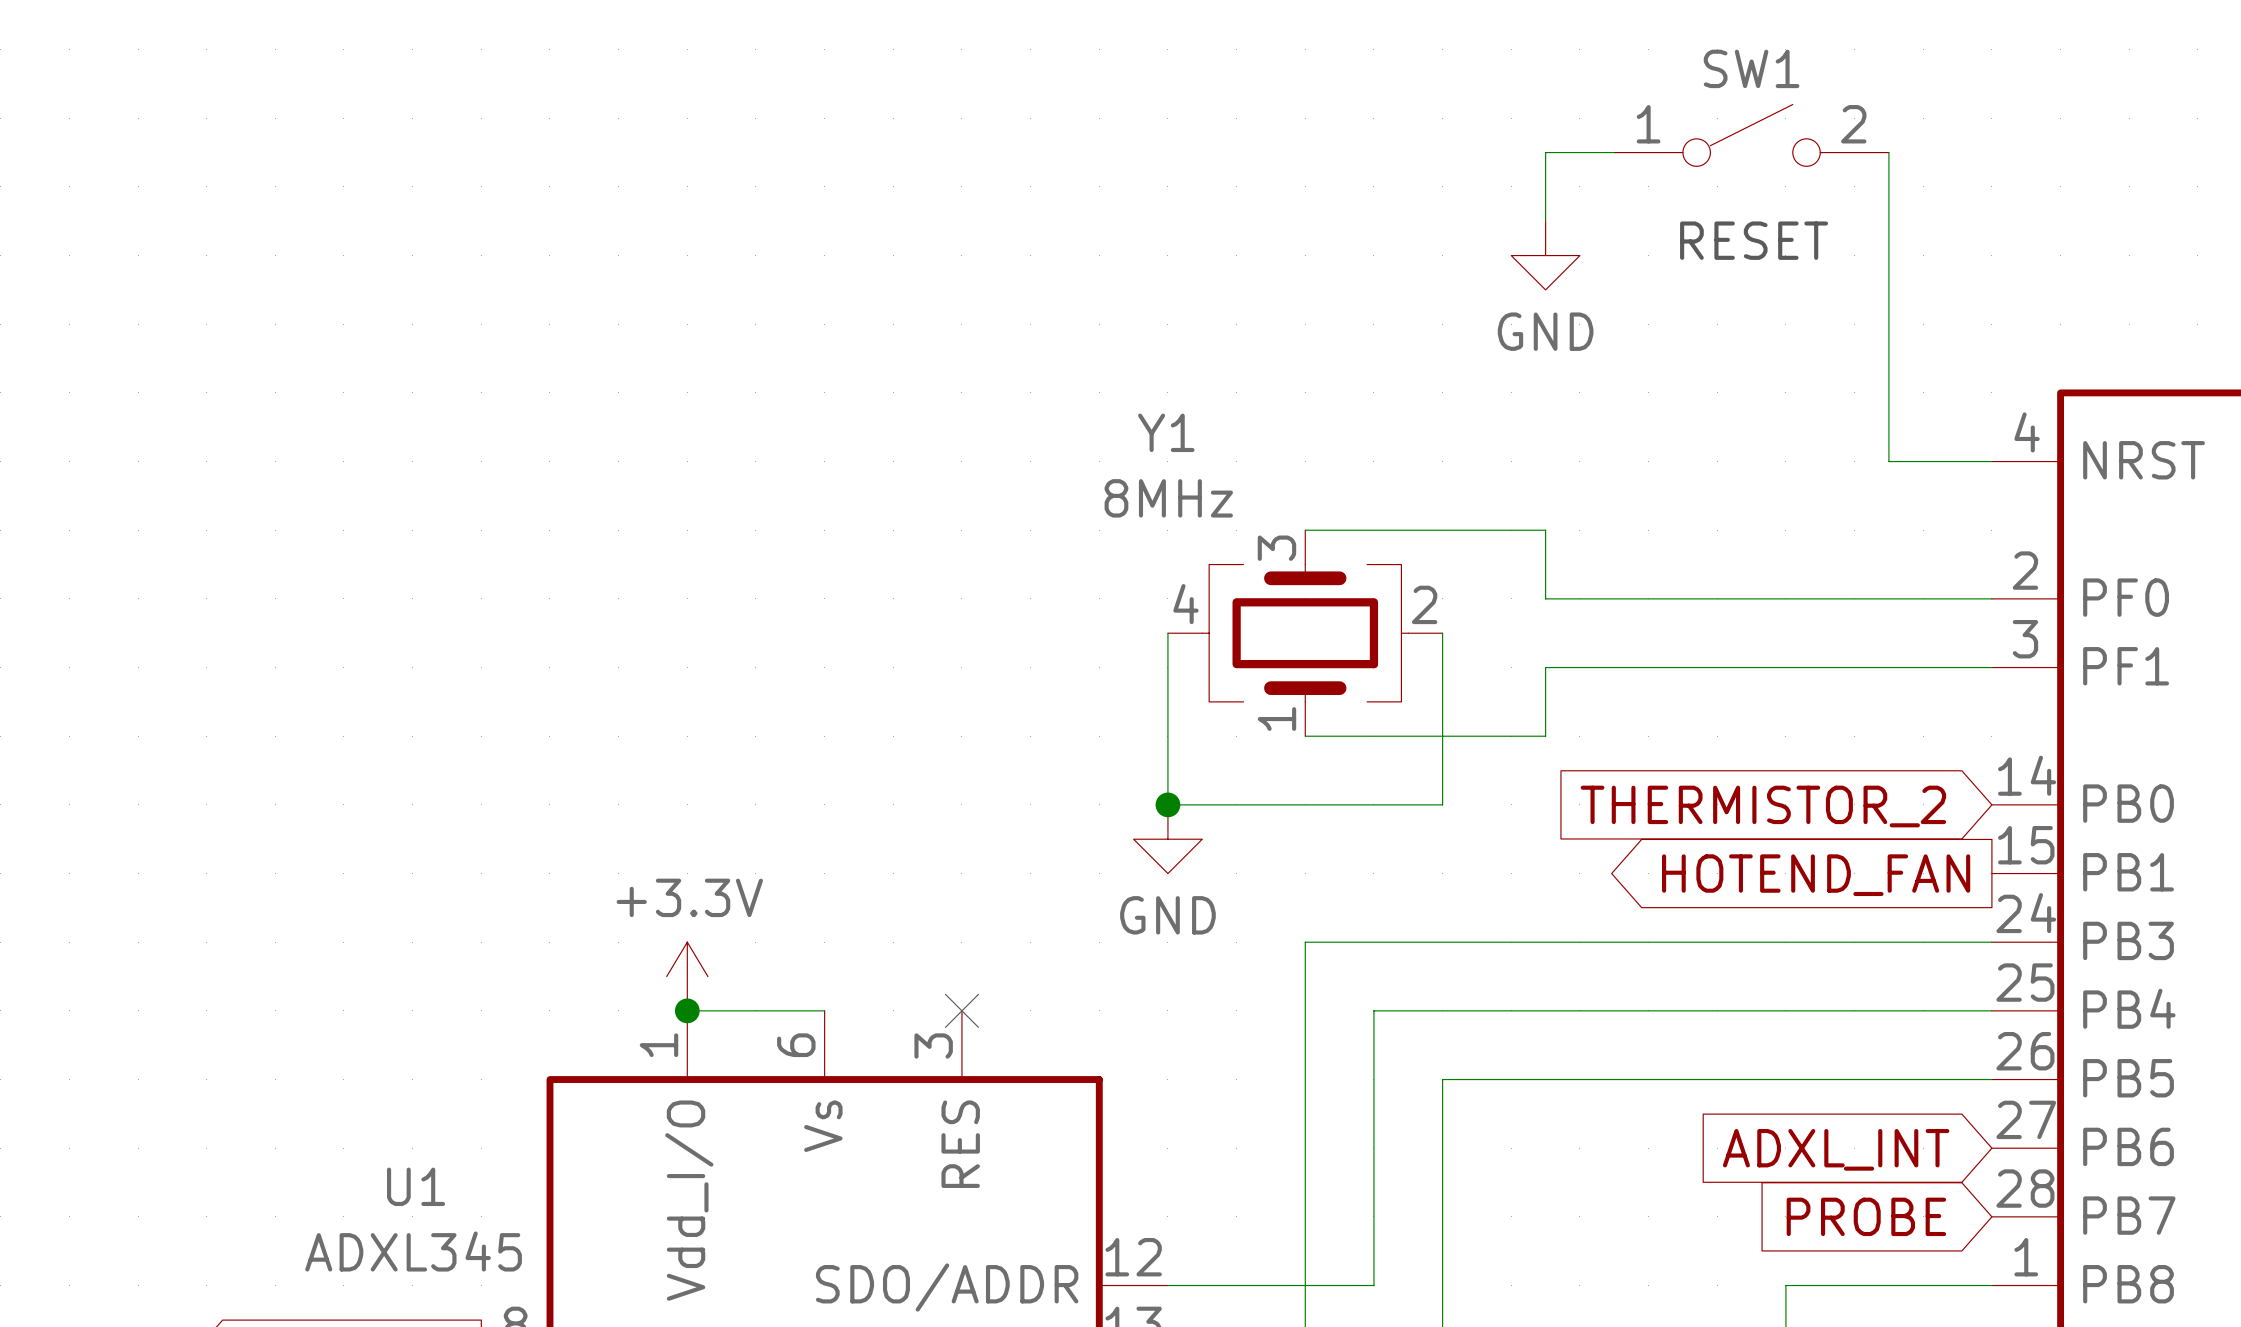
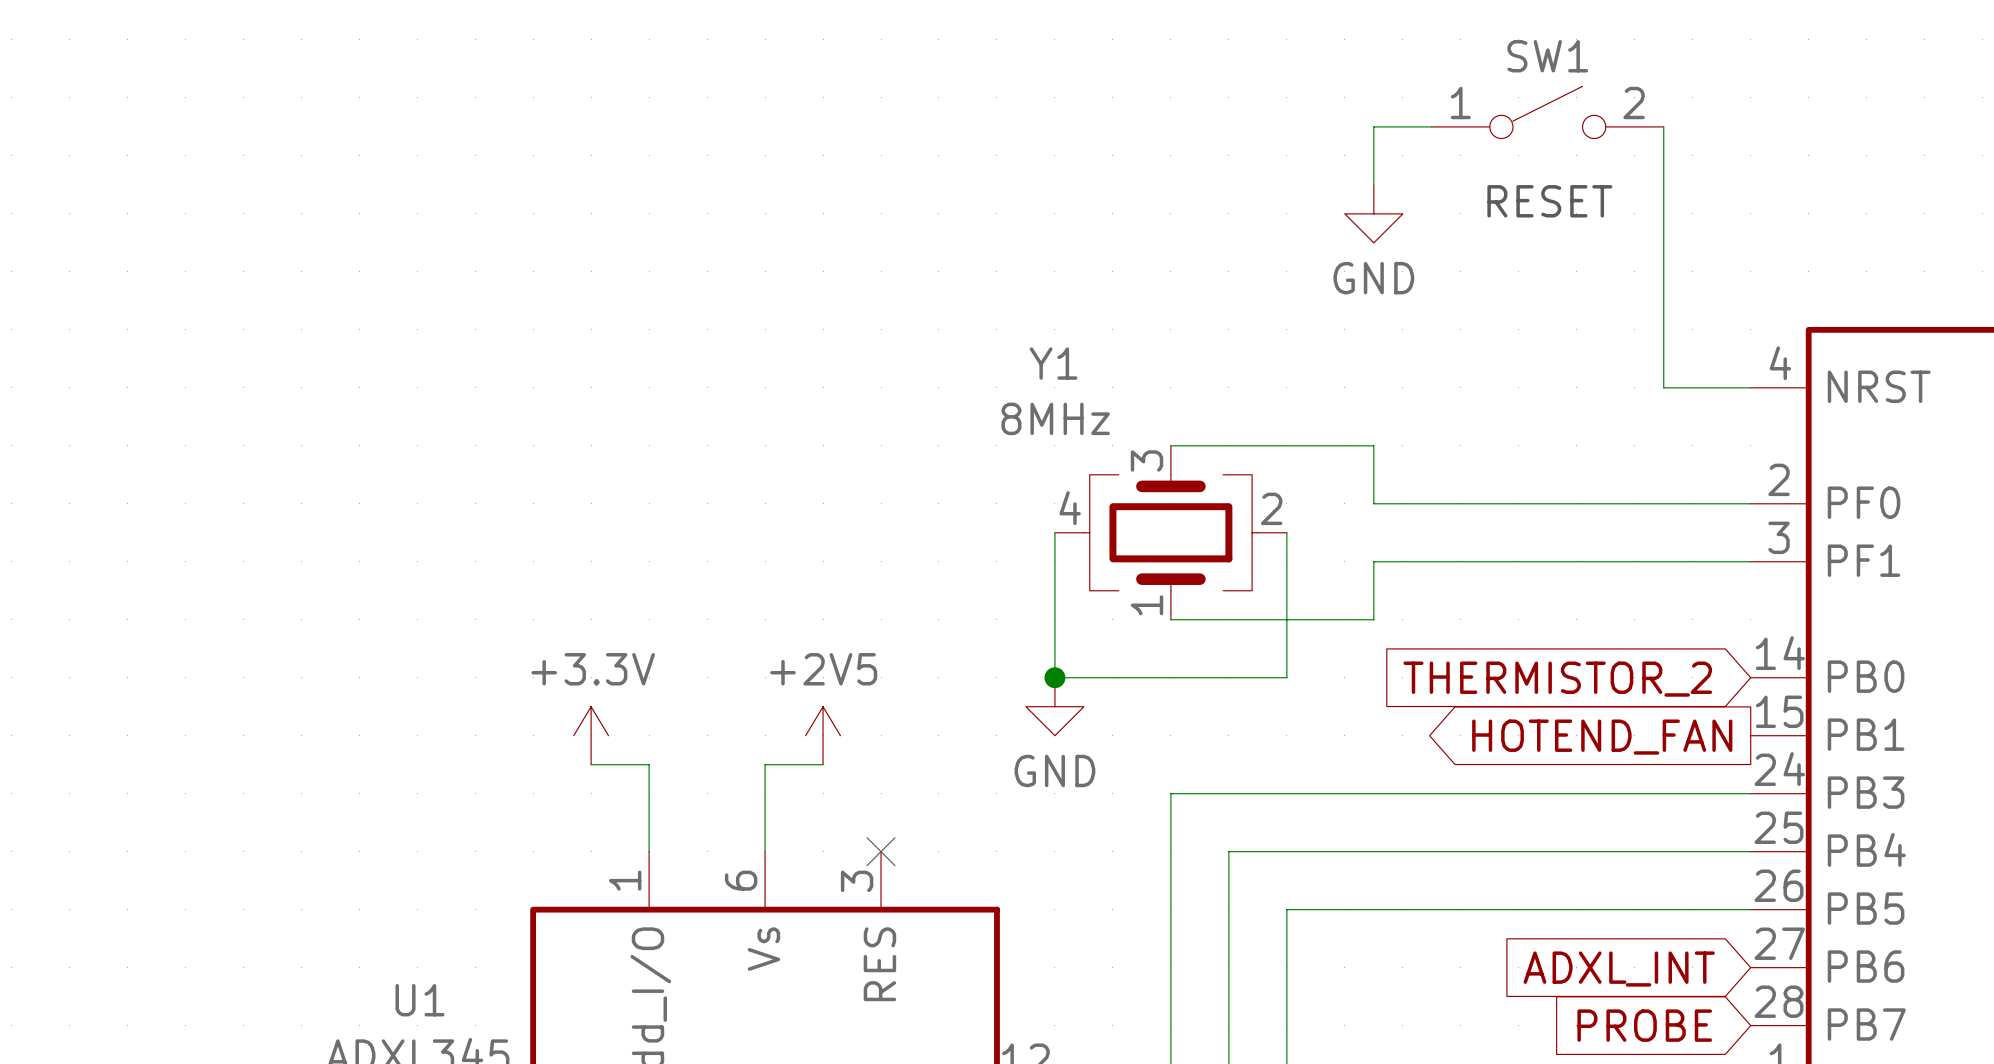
power symbol: none -> +2V5 (823, 735)
wire: none -> (823, 764) (765, 764) (765, 851)
power symbol position: +3.3V (687, 976) -> +3.3V (591, 735)
wire: (687, 1010) (824, 1010) -> (649, 851) (649, 764) (591, 764)
junction: (687, 1010) -> none

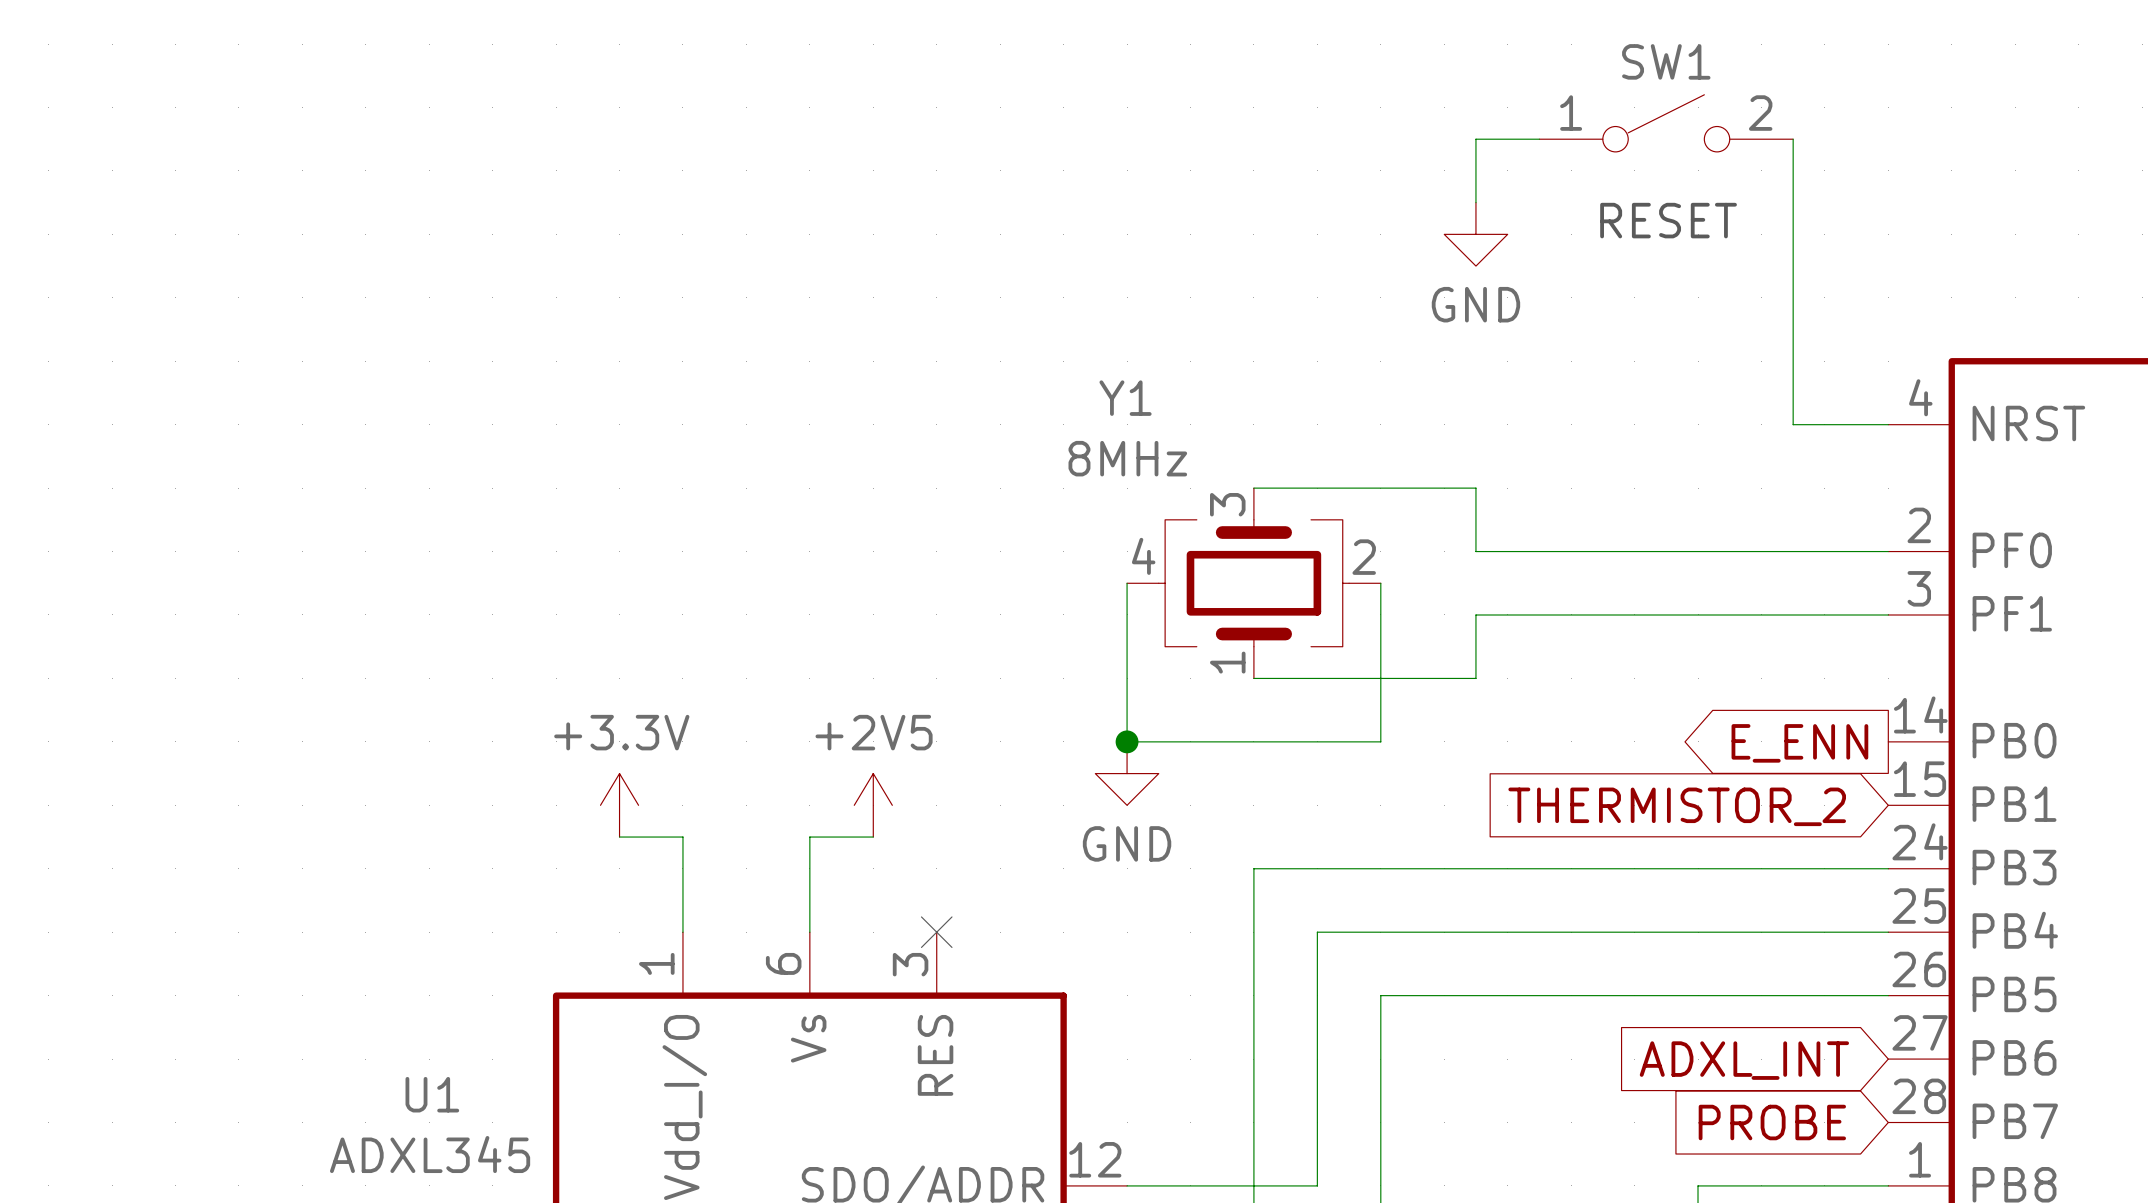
global label shape: input (1557, 679) -> output (1799, 743)
global label: THERMISTOR_2 (1557, 679) -> E_ENN (1799, 743)
global label shape: output (1602, 737) -> input (1677, 806)
global label: HOTEND_FAN (1602, 737) -> THERMISTOR_2 (1677, 806)

